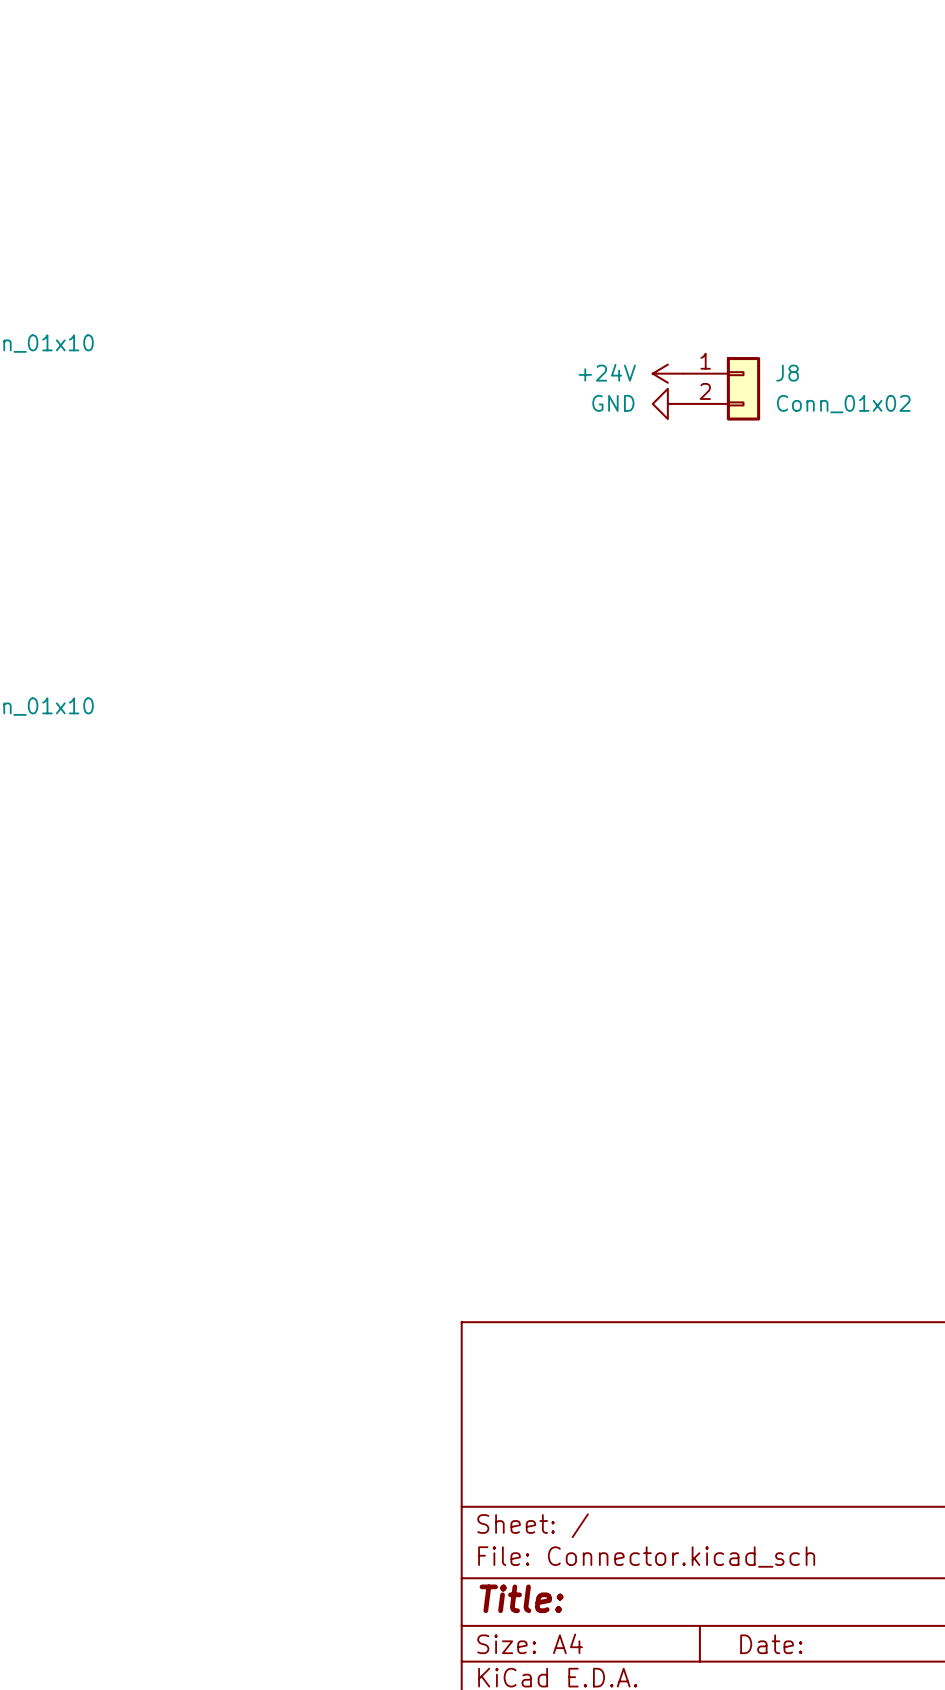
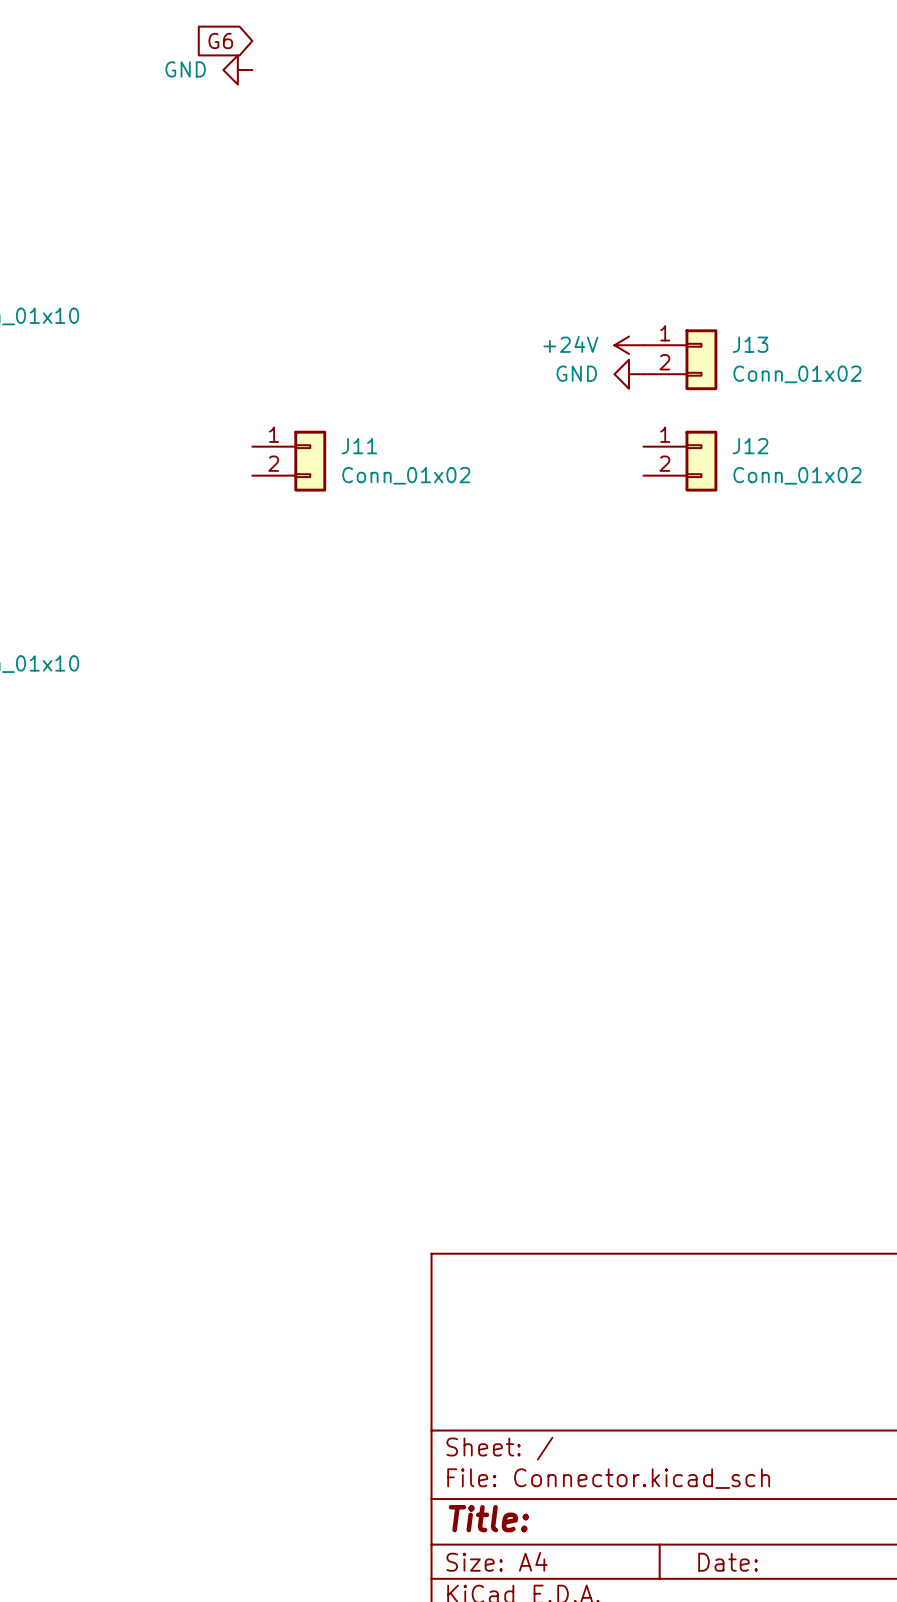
global label: none -> G6 (220, 41)
power symbol: none -> GND (237, 69)
J8 name: J8 (787, 373) -> J13 (750, 344)
J11: none -> Conn_01x02 (289, 461)
J12: none -> Conn_01x02 (680, 461)

